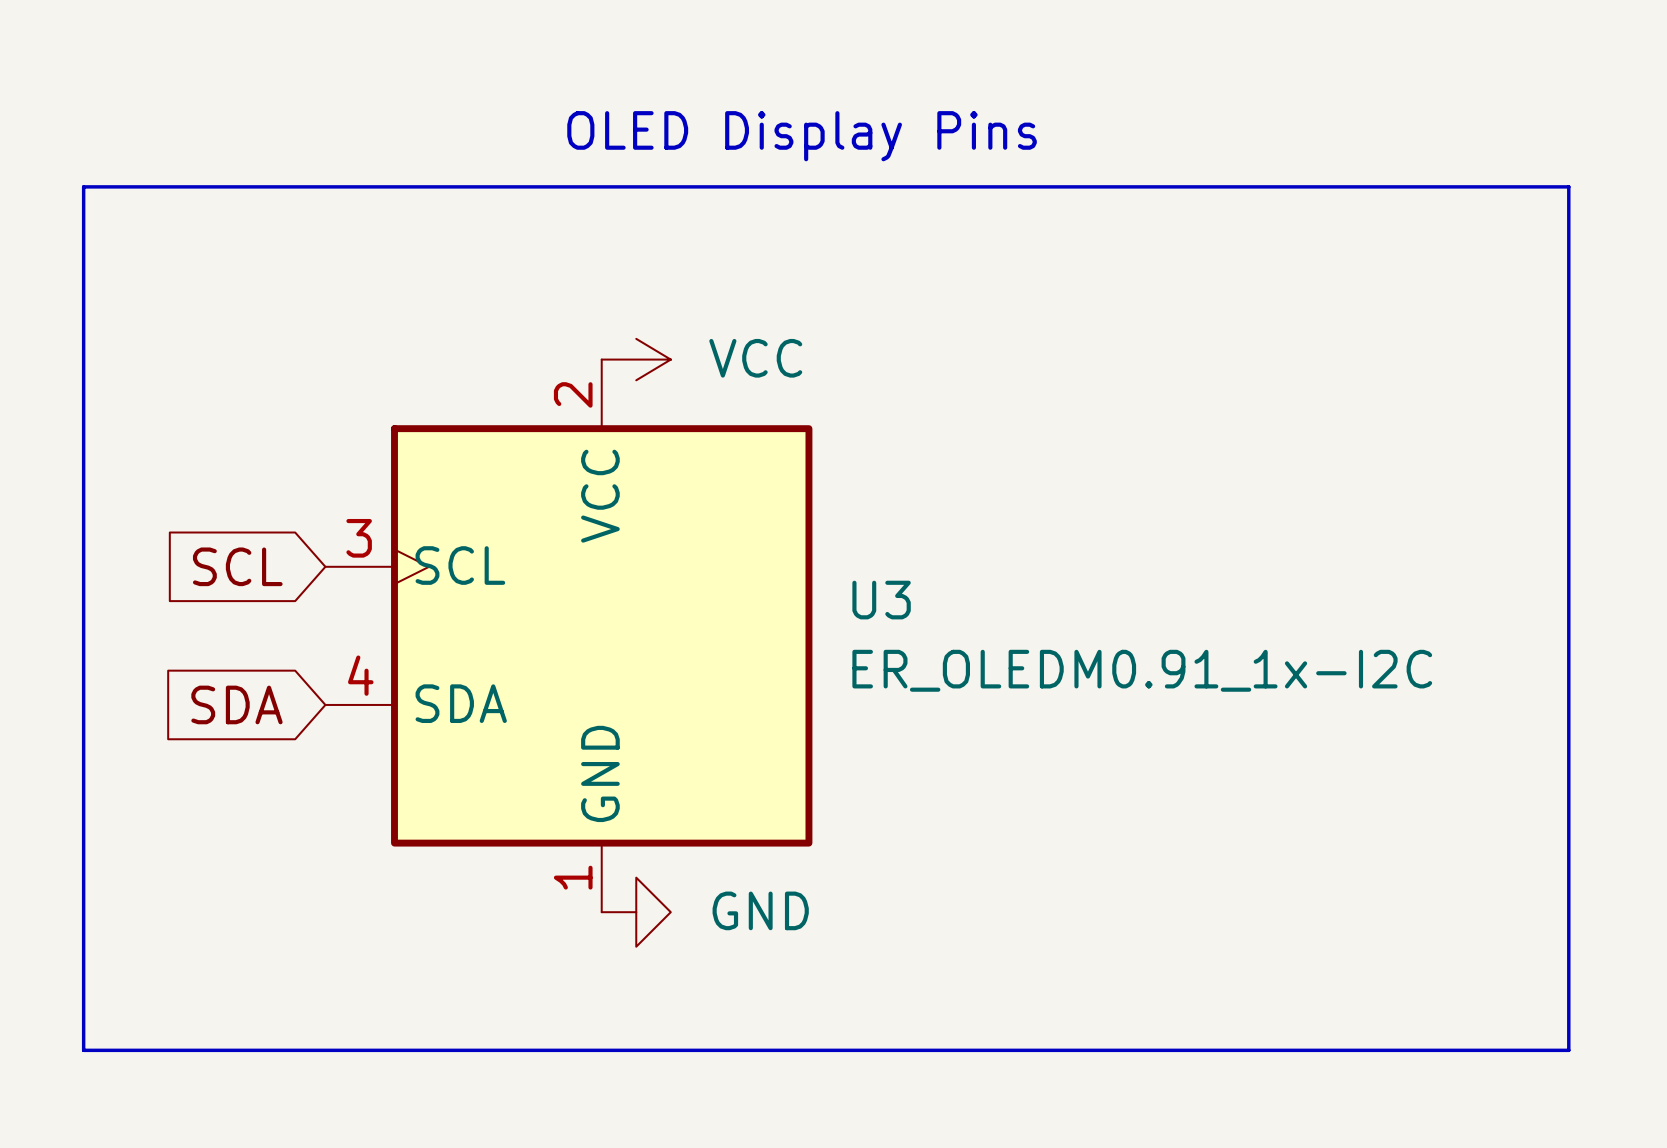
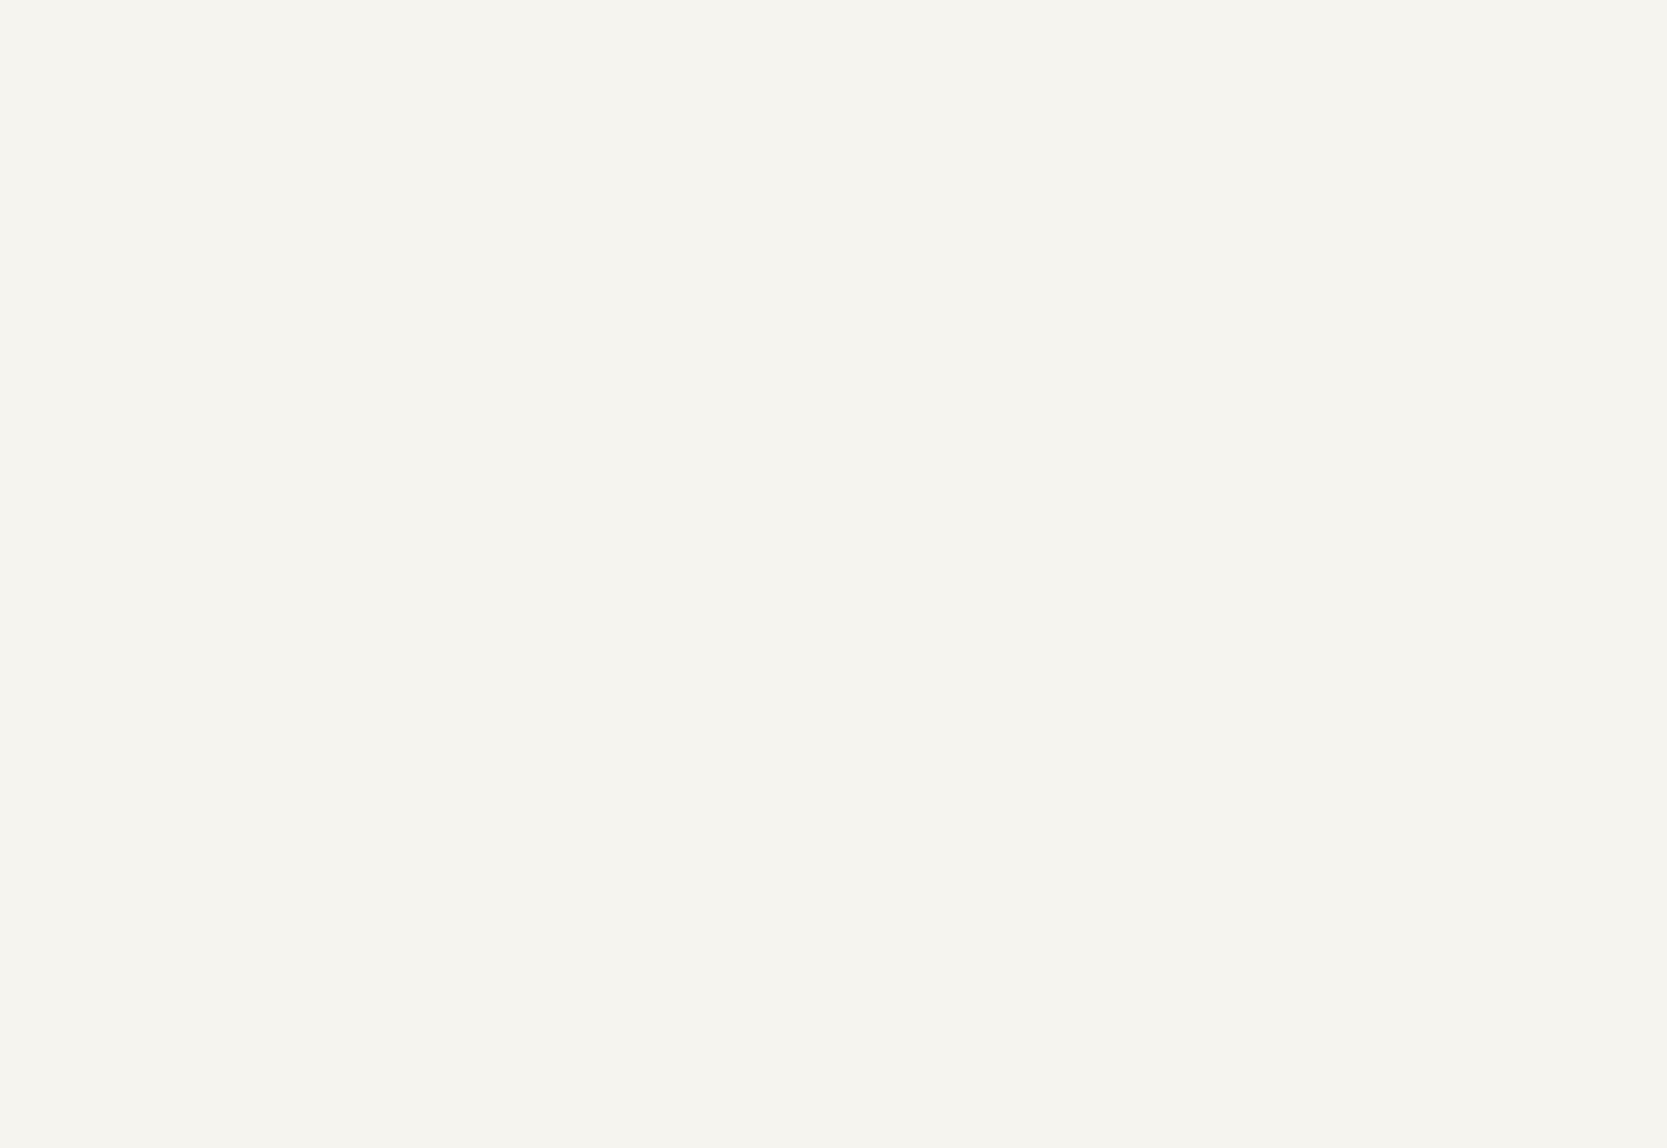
text: OLED Display Pins (802, 136) -> none
line: (83, 186) (1568, 186) (1568, 1050) (83, 1050) (83, 186) -> none
power symbol: VCC (636, 359) -> none
global label: SCL (237, 566) -> none
U3: ER_OLEDM0.91_1x-I2C (568, 635) -> none
global label: SDA (236, 704) -> none
power symbol: GND (636, 912) -> none

